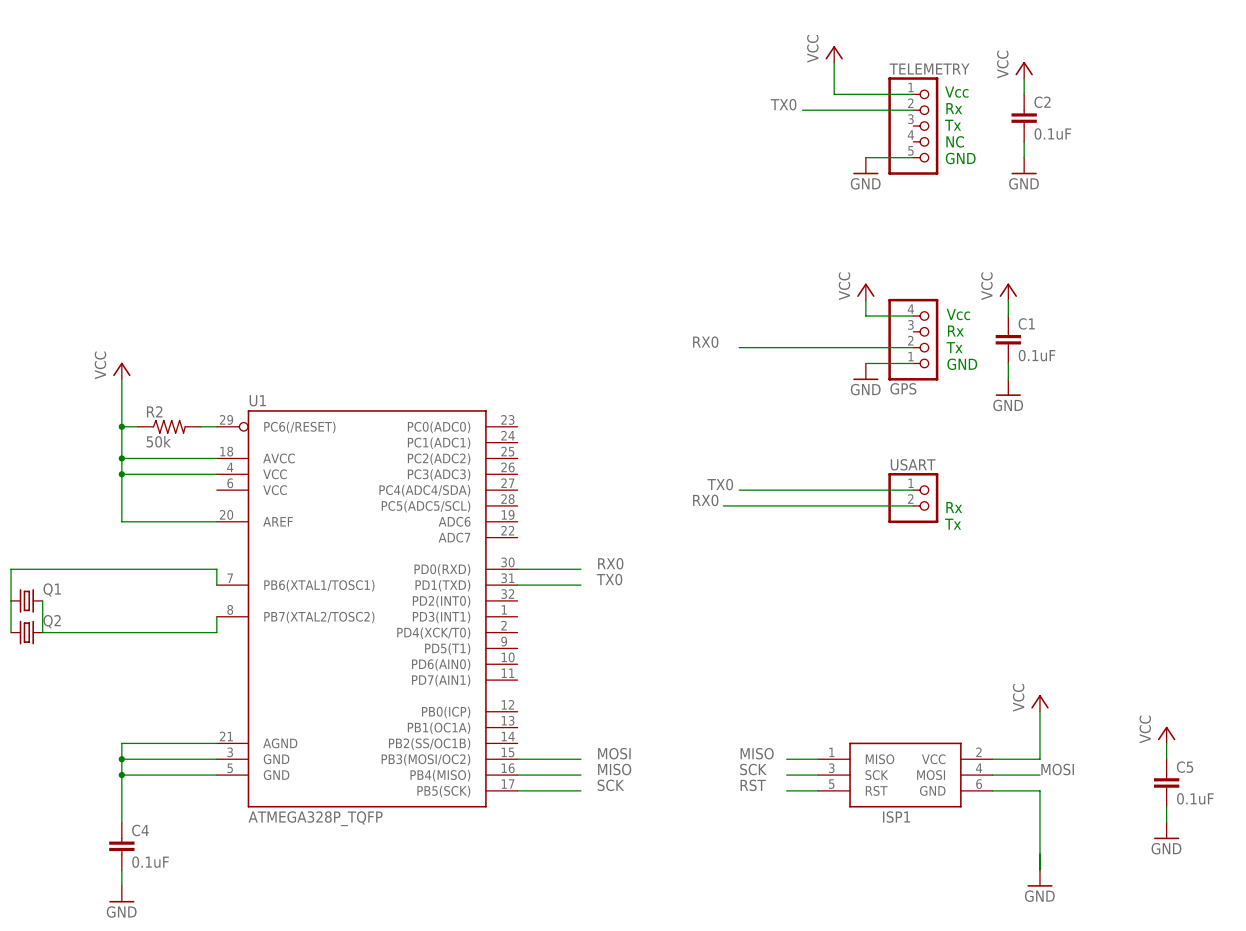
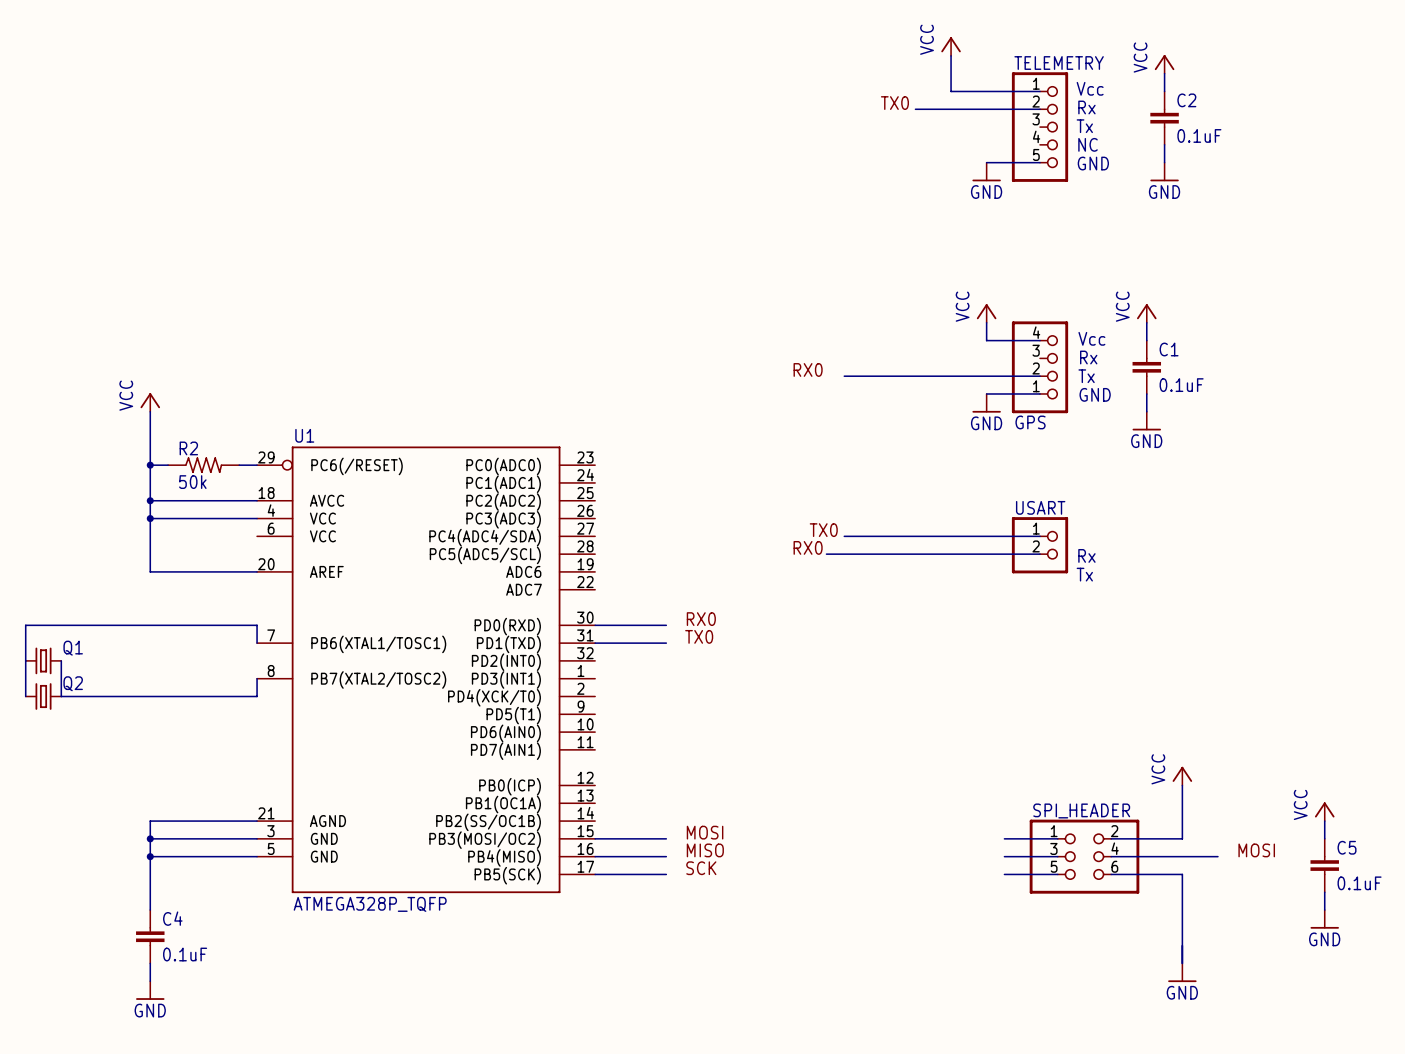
label: MISO (757, 753) -> none
wire: (786, 759) (818, 759) -> none
wire: none -> (1004, 838) (1057, 838)
label: SCK (753, 769) -> none
label position: MOSI (1057, 769) -> MOSI (1256, 850)
wire: (786, 775) (818, 775) -> none
wire: none -> (1004, 856) (1057, 856)
ISP1: (905, 775) -> none
SPI_HEADER: none -> (1084, 856)
wire: none -> (1182, 856) (1217, 856)
label: RST (753, 785) -> none
wire: (786, 790) (818, 790) -> none
wire: none -> (1004, 874) (1057, 874)

